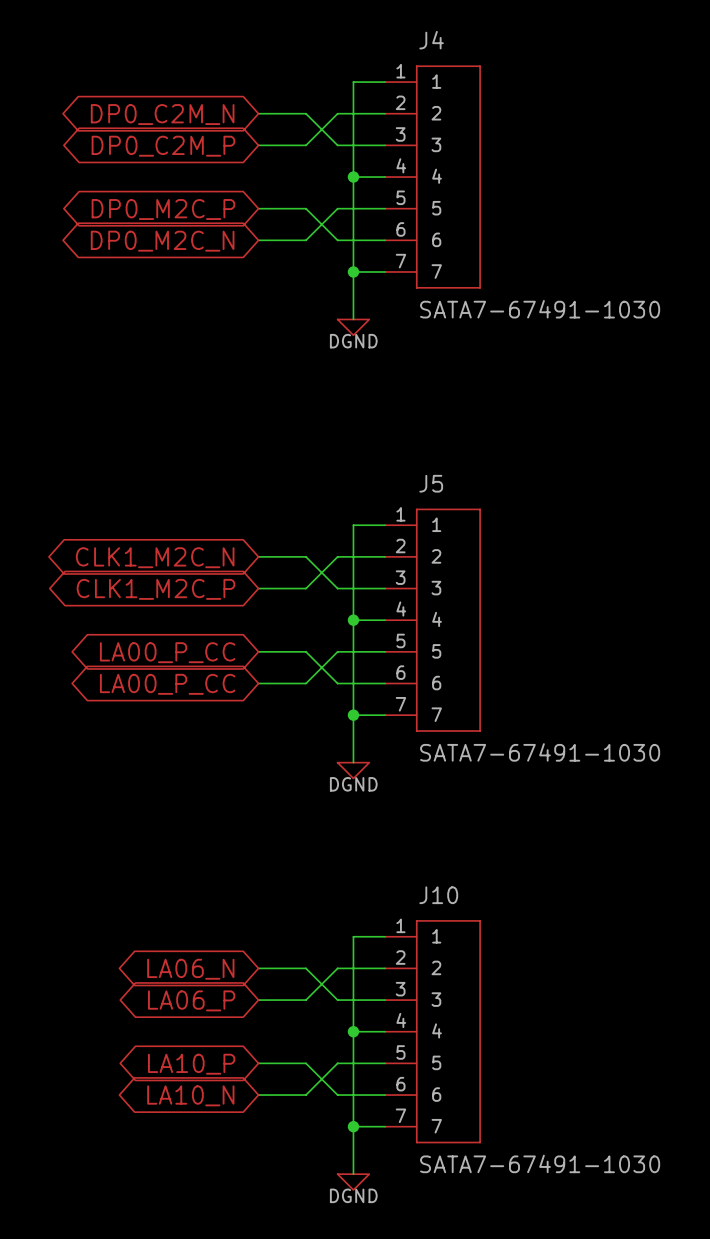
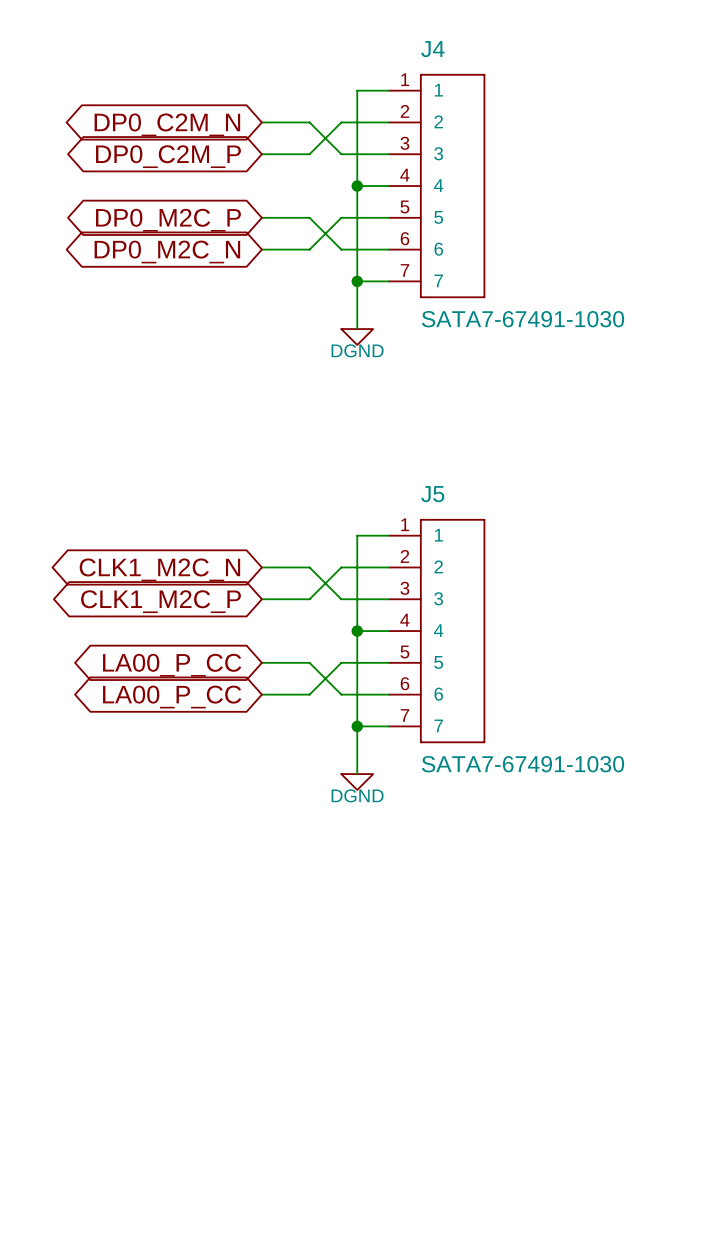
wire: (385, 936) (353, 936) (353, 1174) -> none
wire: (258, 968) (305, 968) (337, 1000) (385, 1000) -> none
wire: (385, 968) (337, 968) (305, 1000) (258, 1000) -> none
global label: LA06_N (190, 969) -> none
global label: LA06_P (191, 1000) -> none
wire: (353, 1031) (385, 1031) -> none
junction: (353, 1031) -> none
J10: SATA7-67491-1030 (432, 1031) -> none
wire: (258, 1063) (305, 1063) (337, 1095) (385, 1095) -> none
wire: (385, 1063) (337, 1063) (305, 1095) (258, 1095) -> none
global label: LA10_P (191, 1064) -> none
global label: LA10_N (190, 1095) -> none
wire: (353, 1126) (385, 1126) -> none
junction: (353, 1126) -> none
power symbol: DGND (353, 1182) -> none

